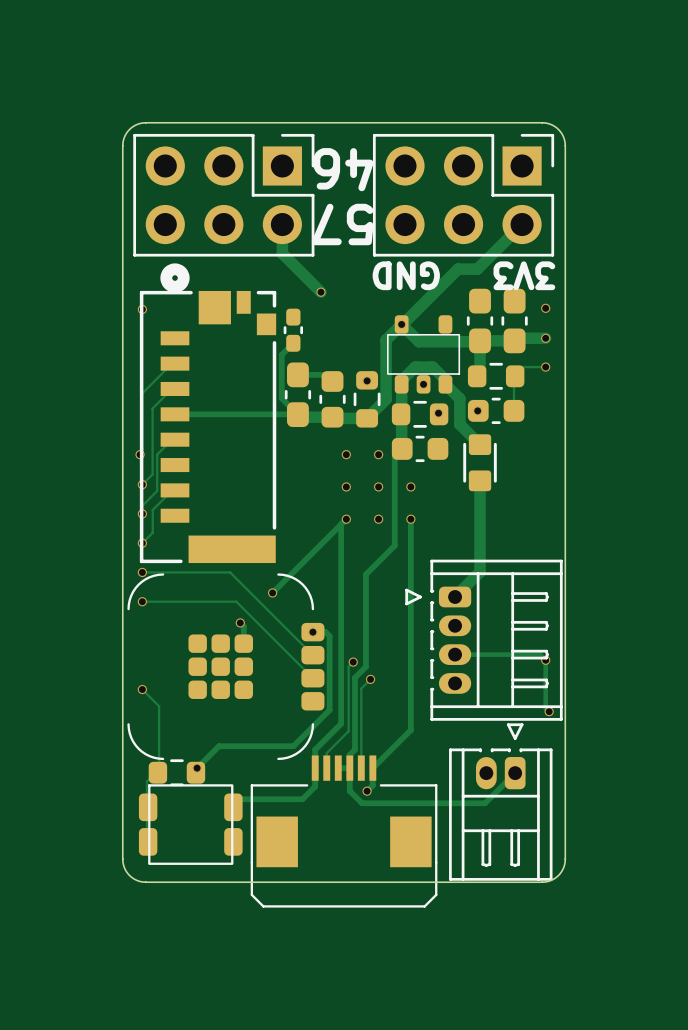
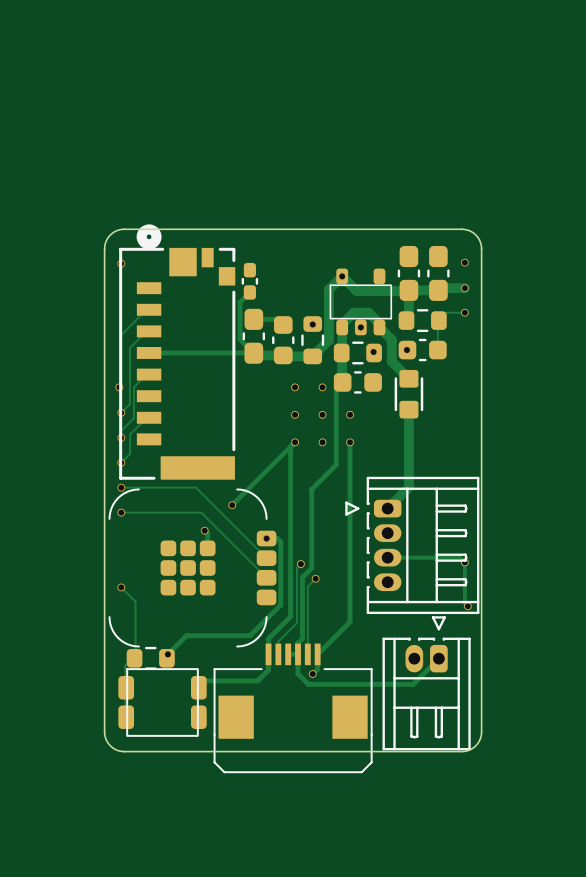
text: 6 (326, 168) -> none
text: 4 (359, 169) -> none
part: (223, 195) -> none
part: (463, 195) -> none
track: (282, 224) (282, 253) (320, 292) -> none
text: 7 (326, 224) -> none
text: 5 (360, 224) -> none
track: (522, 224) (477, 269) (458, 269) (401, 324) -> none
text: GND (406, 275) -> none
text: 3V3 (524, 275) -> none
via: (320, 292) -> none
board edge: (565, 292) (565, 143) (561, 133) (556, 127) (542, 122) (138, 124) (127, 131) (122, 143) (122, 292) -> (481, 248) (475, 235) (461, 229) (124, 229) (110, 235) (104, 248)

